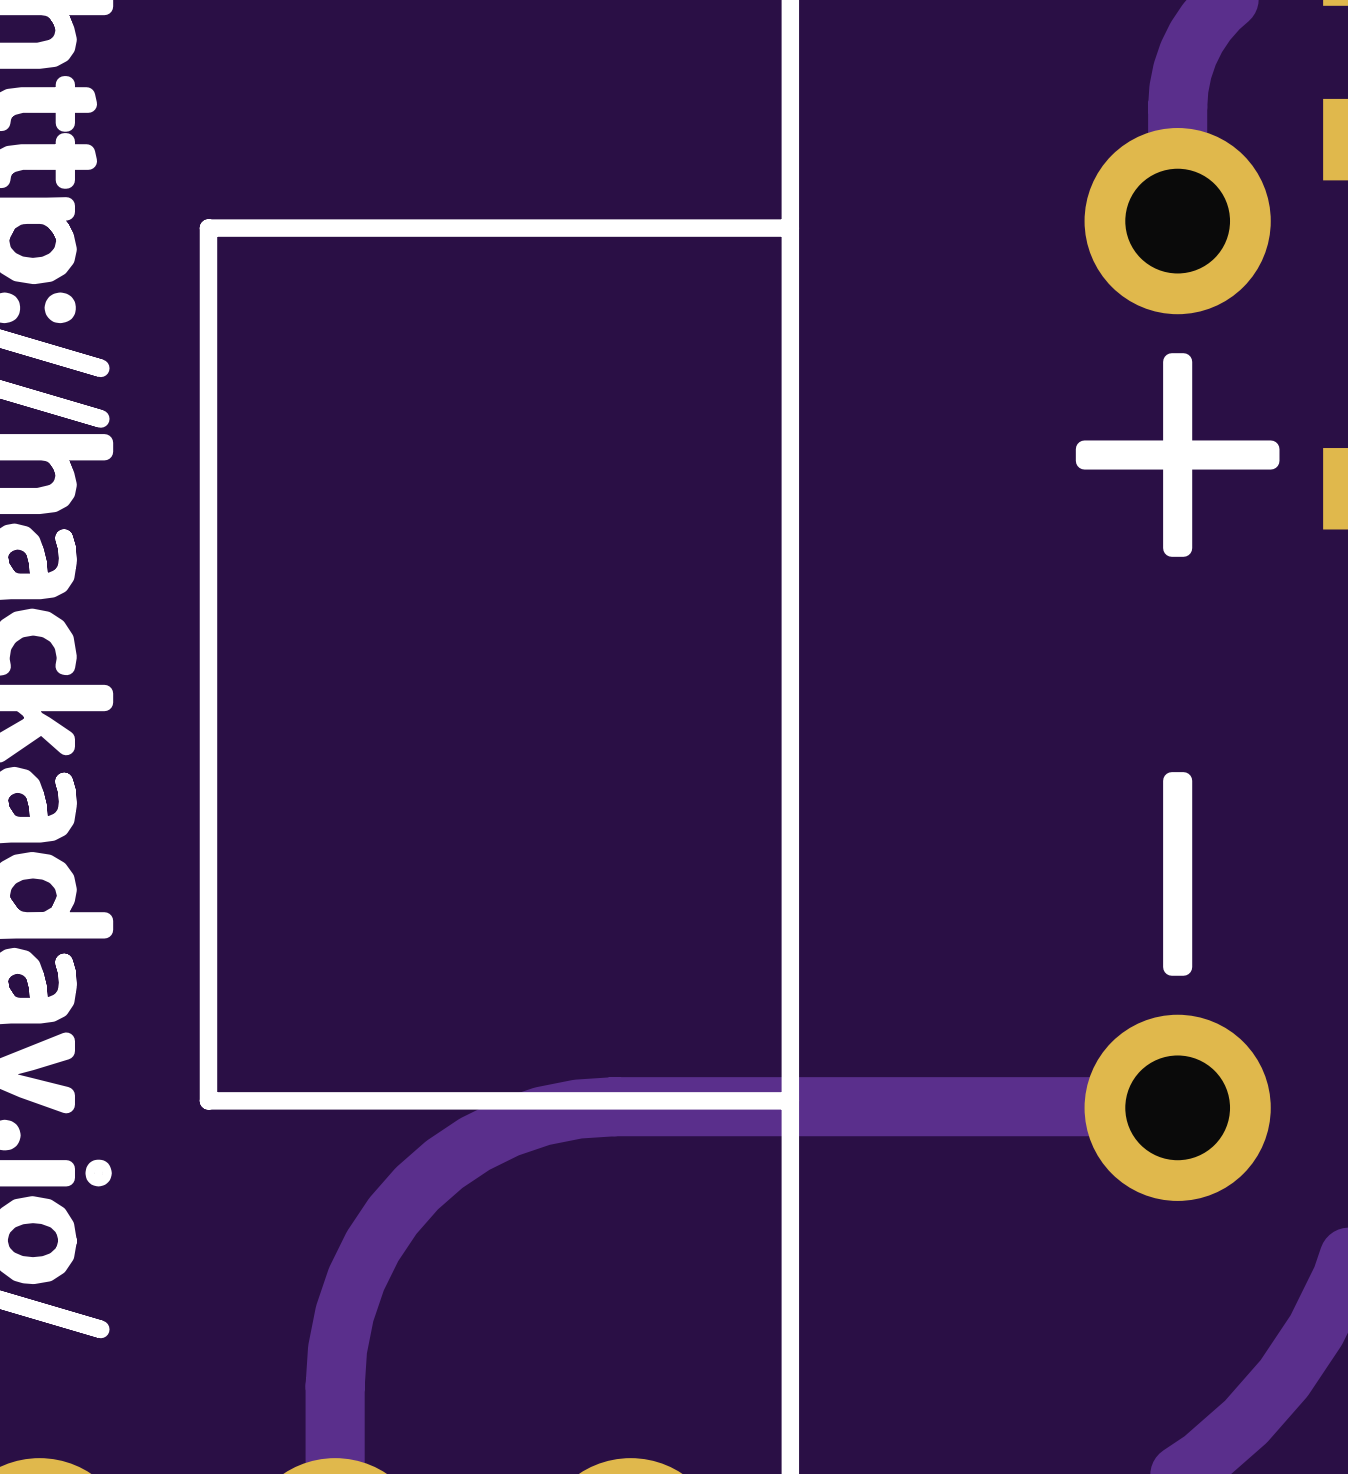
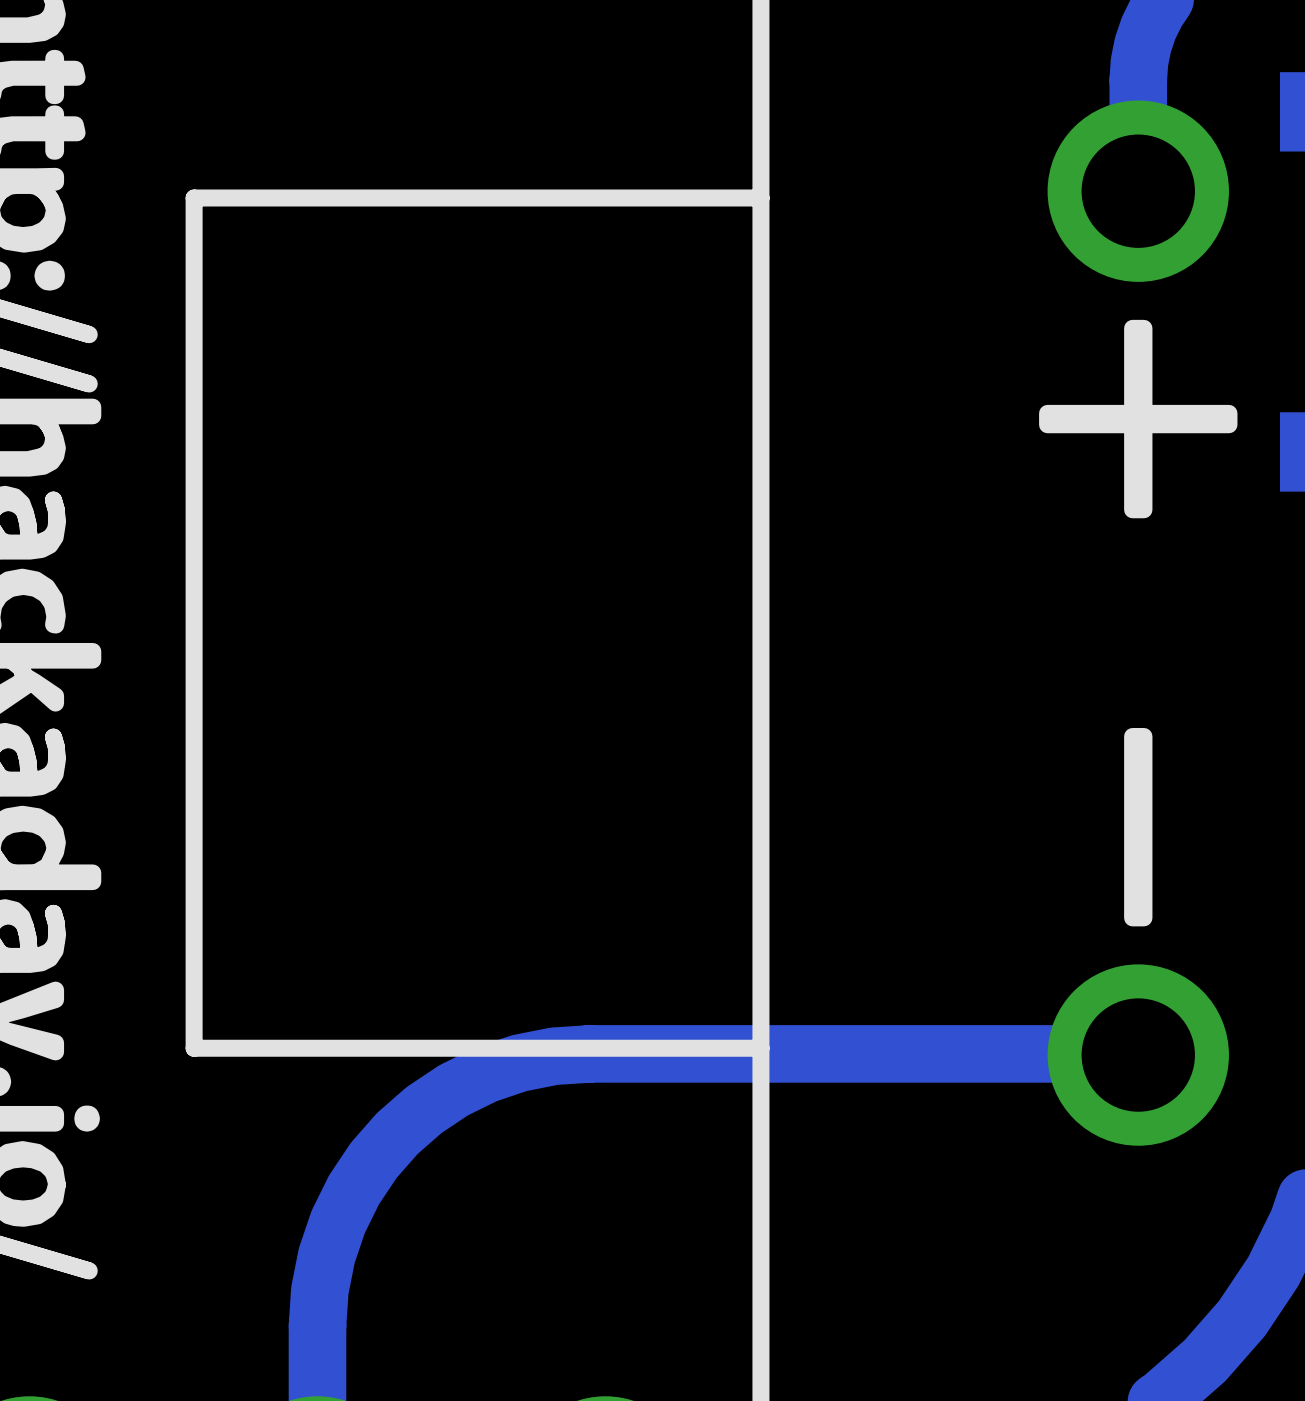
part footprint: [1084, 128, 1271, 315] -> [1047, 100, 1229, 282]
part footprint: [1084, 1014, 1271, 1201] -> [1047, 964, 1229, 1146]

